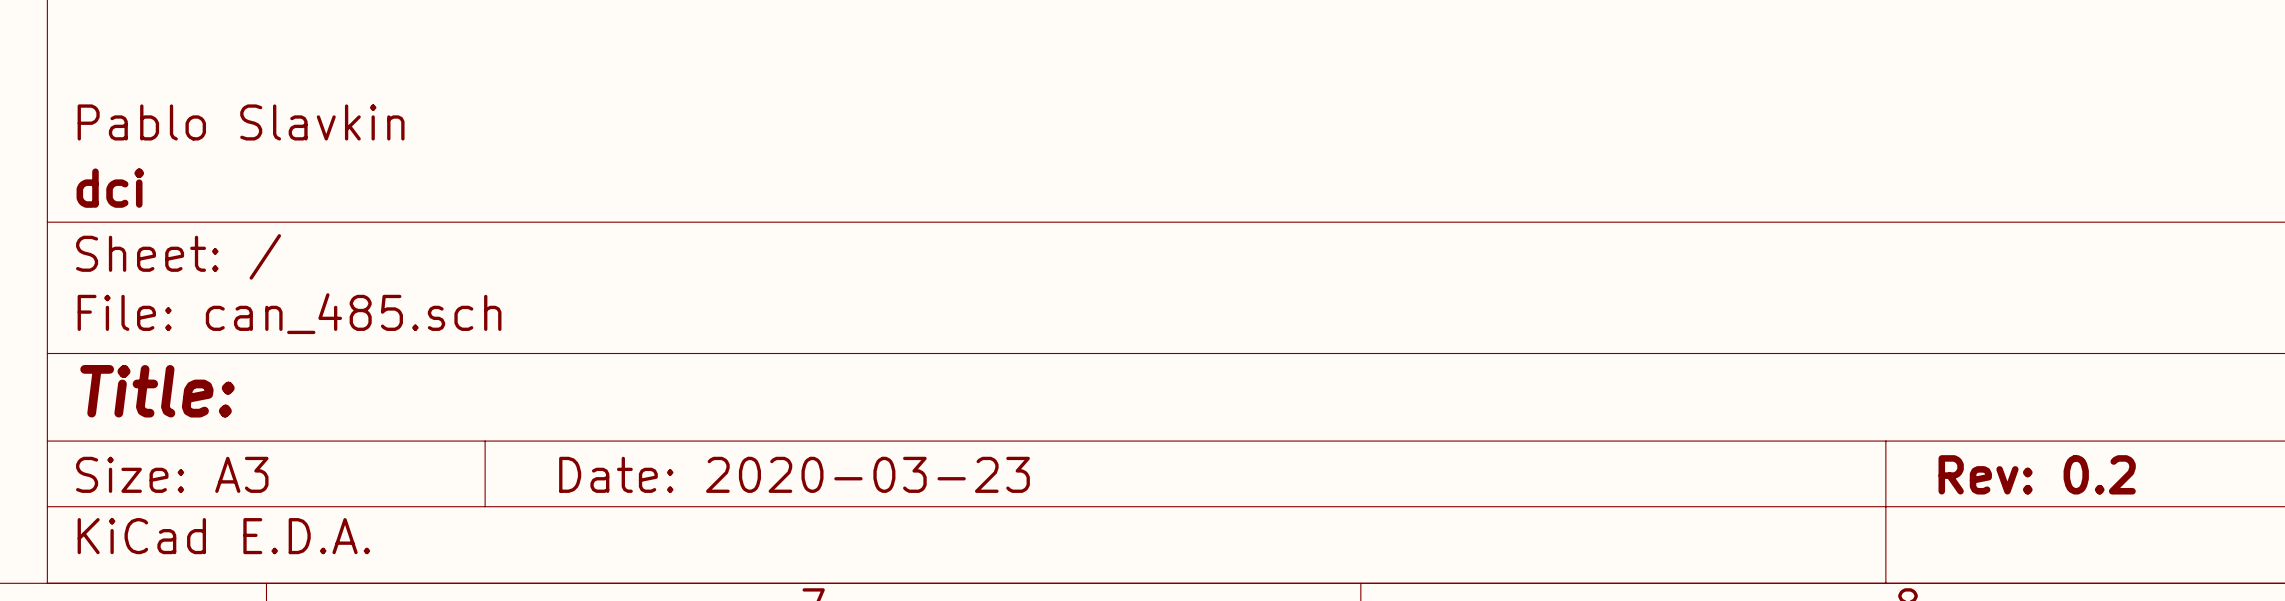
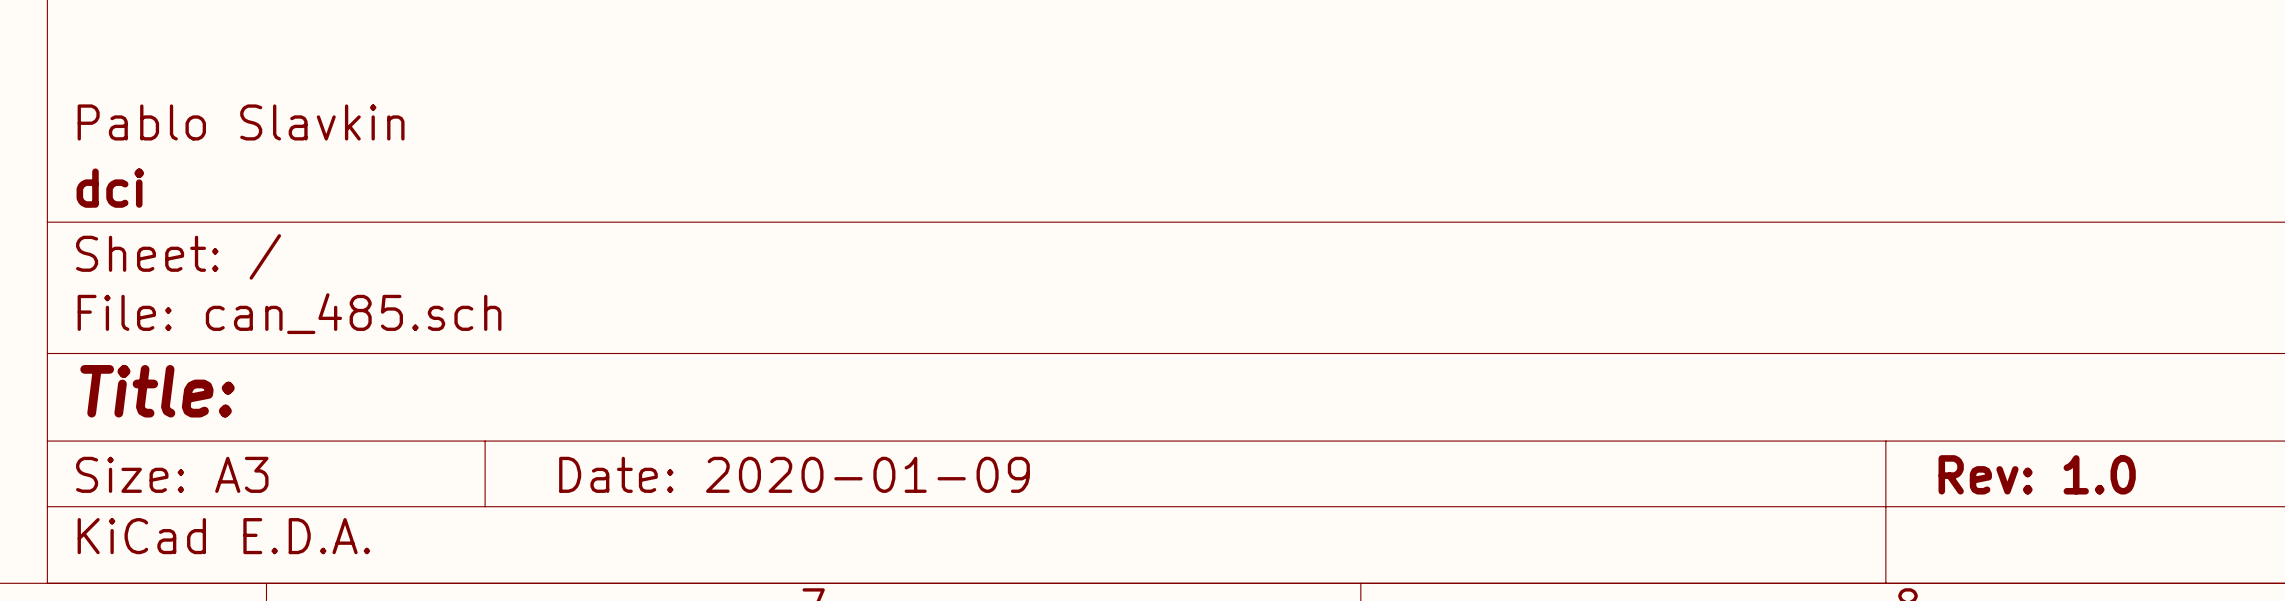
title block: Date: 2020-03-23 (794, 474) -> Date: 2020-01-09 (794, 474)
title block: Rev: 0.2 (2037, 474) -> Rev: 1.0 (2037, 474)

